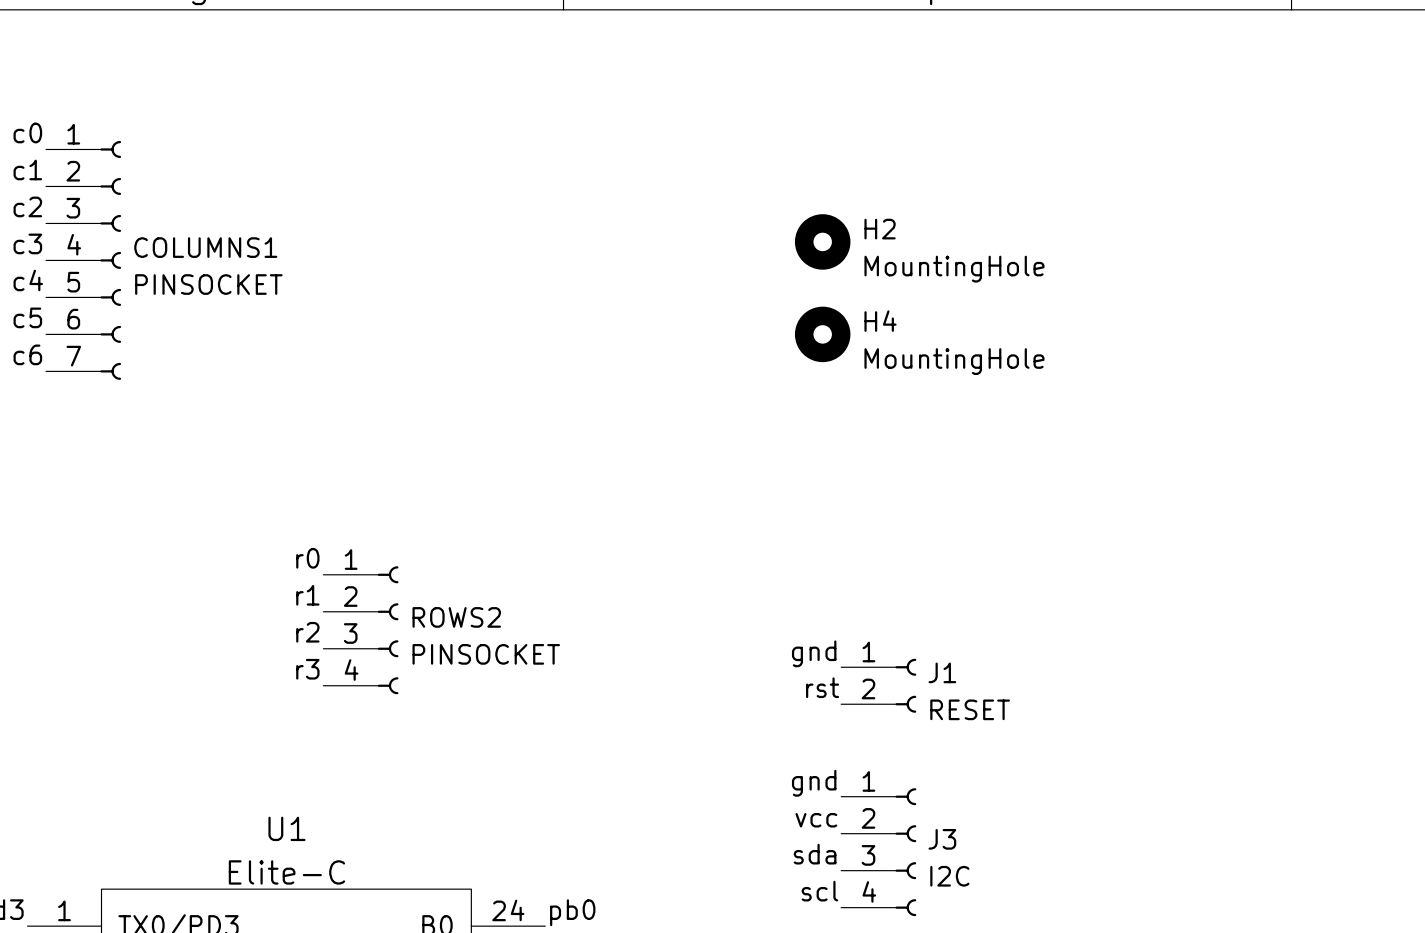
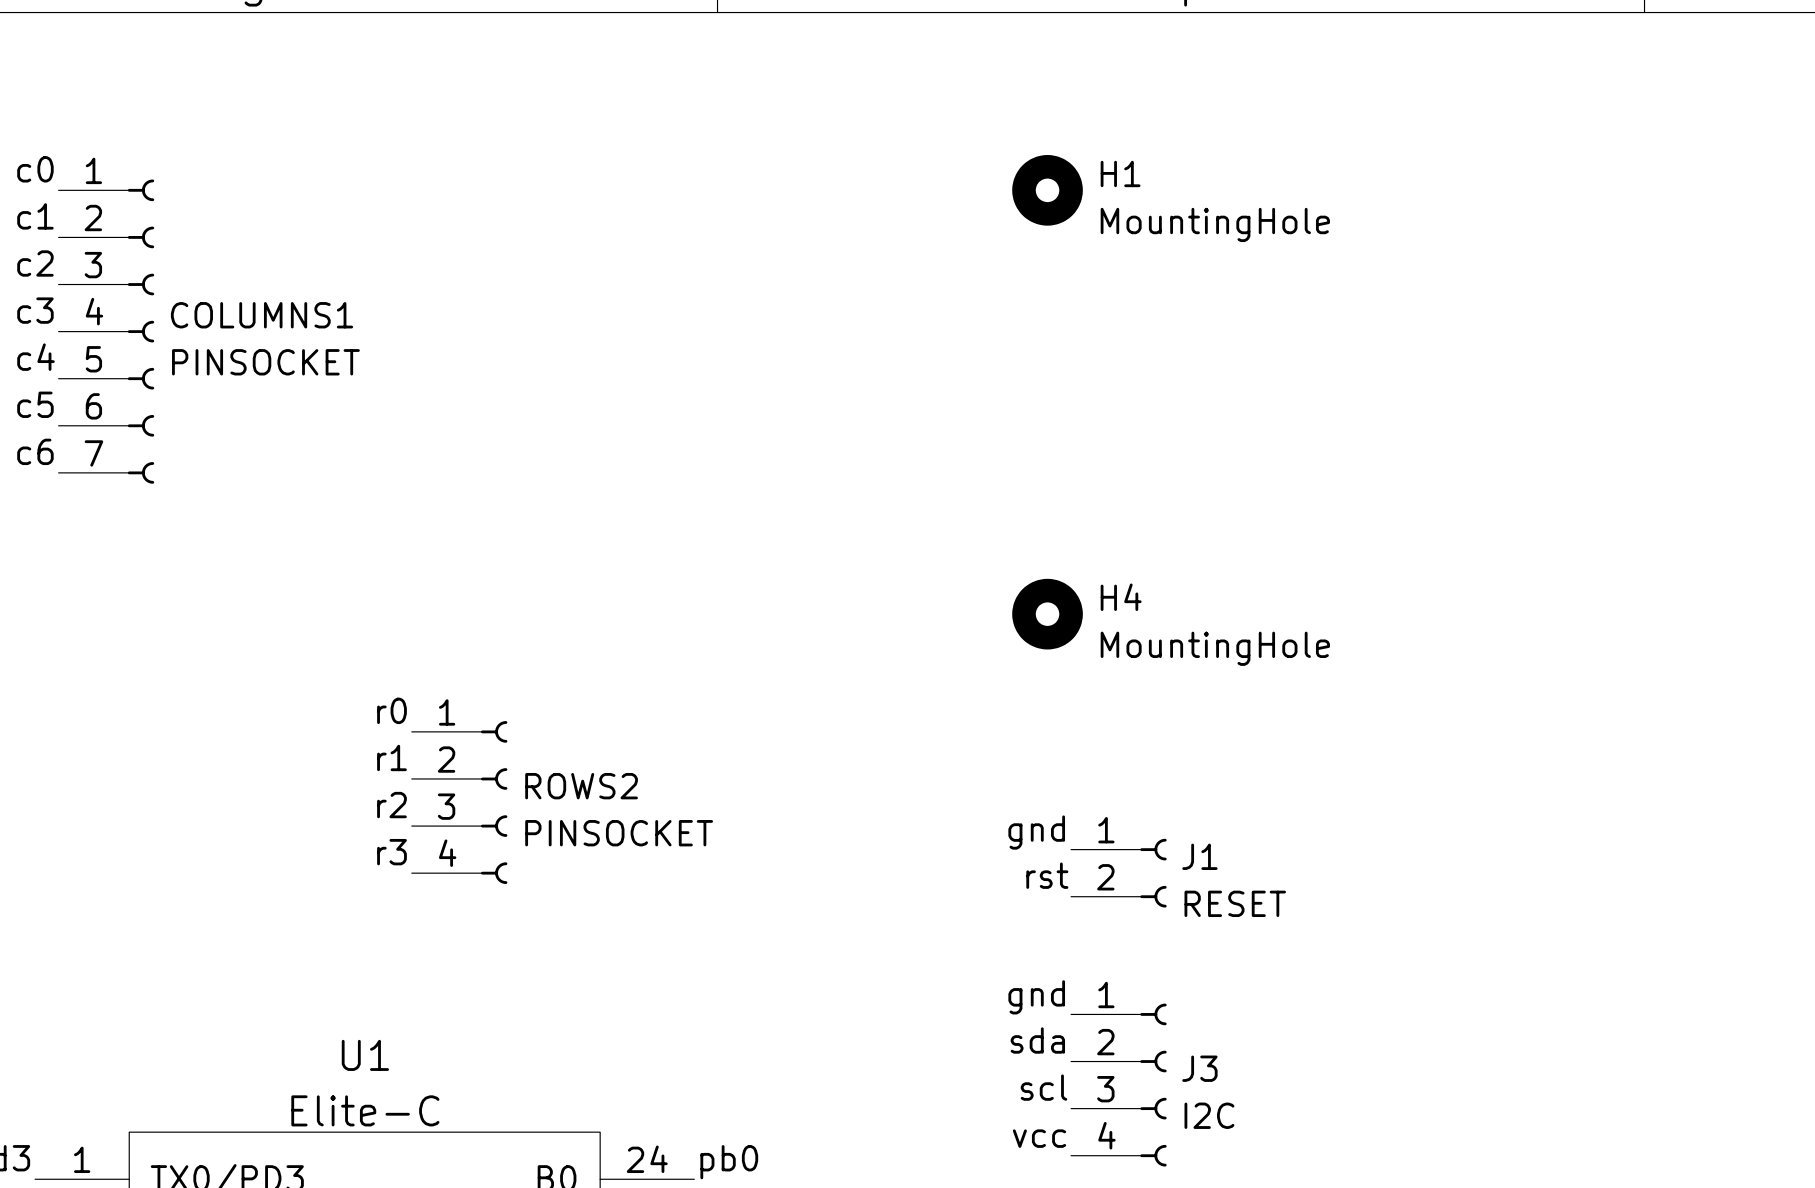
H1: none -> MountingHole (1047, 190)
H2: MountingHole (822, 241) -> none
H4 position: (822, 334) -> (1047, 614)
label: vcc (816, 820) -> sda (1037, 1040)
label: sda (815, 854) -> scl (1043, 1087)
label: scl (819, 891) -> vcc (1039, 1138)

